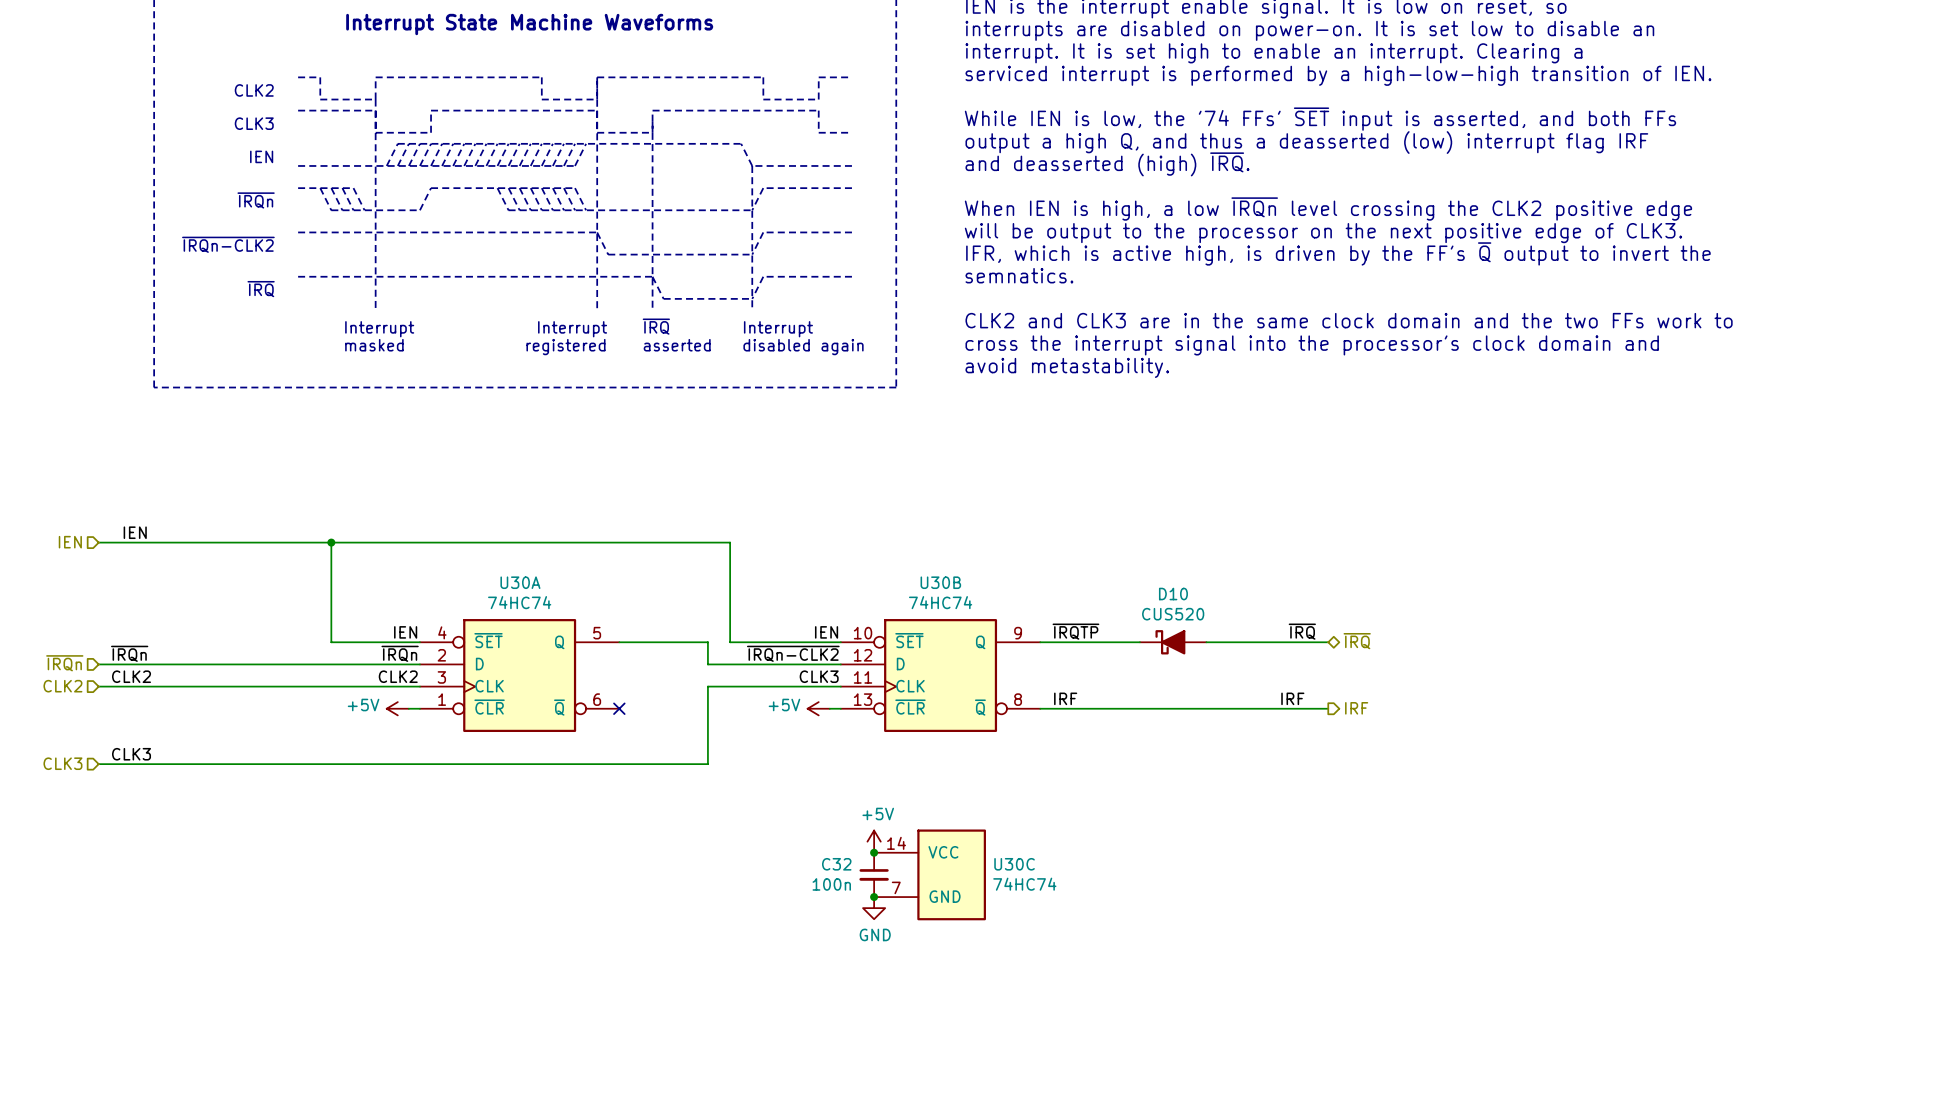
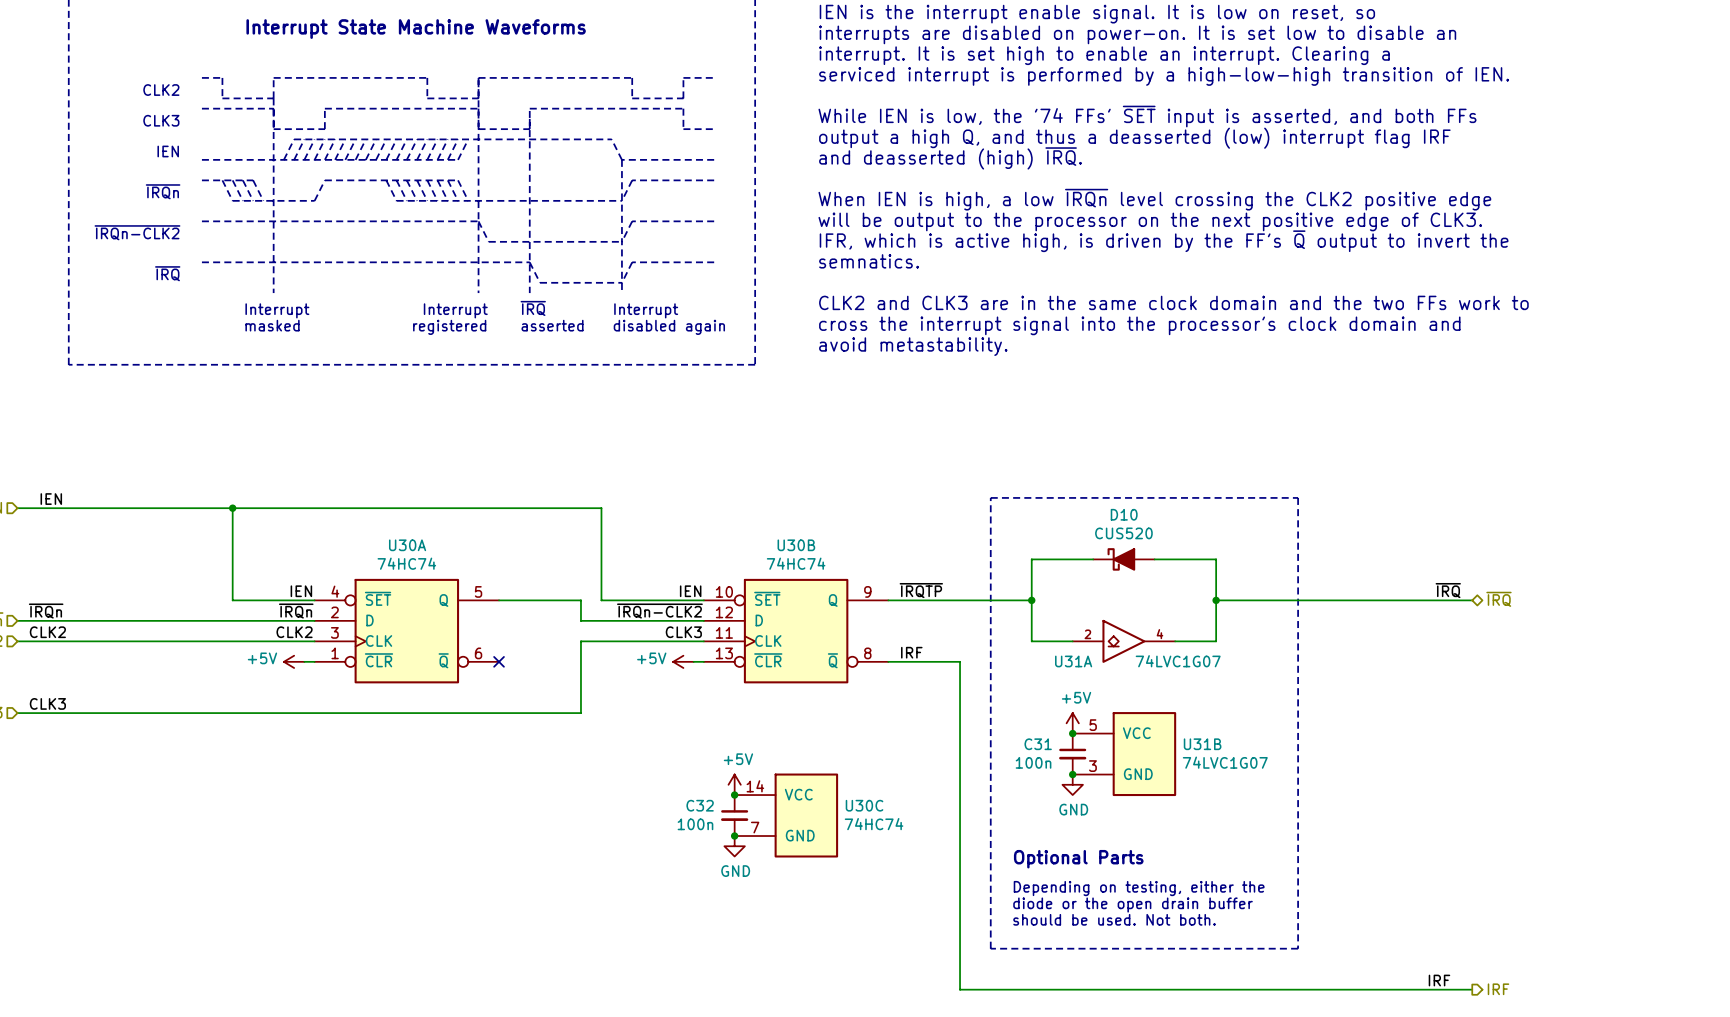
line: none -> (990, 497) (1298, 497) (1298, 948) (990, 948) (990, 497)
wire: none -> (1093, 559) (1031, 559) (1031, 641) (1072, 641)
wire: none -> (1154, 559) (1216, 559) (1216, 641) (1175, 641)
label: ~{IRQ} (1302, 631) -> none
label: none -> ~{IRQ} (1448, 590)
hierarchical label: ~{IRQ} (1357, 641) -> none
hierarchical label: none -> ~{IRQ} (1498, 599)
D10 position: (1173, 642) -> (1123, 559)
junction: none -> (1031, 600)
wire: (1206, 642) (1328, 642) -> none
wire: none -> (1216, 600) (1472, 600)
junction: none -> (1216, 600)
U31A: none -> 74LVC1G07 (1123, 641)
label: IRF (1292, 698) -> none
wire: (1117, 708) (1328, 708) -> (960, 661) (960, 989) (1472, 989)
hierarchical label: IRF (1356, 708) -> none
power symbol: none -> +5V (1072, 723)
junction: none -> (1072, 733)
C31: none -> 100n (1072, 754)
U31B: none -> 74LVC1G07 (1124, 754)
junction: none -> (1072, 774)
power symbol: none -> GND (1072, 784)
text: none -> Optional Parts (1078, 859)
text: none -> Depending on testing, either the (1139, 888)
text: none -> diode or the open drain buffer (1133, 905)
text: none -> should be used. Not both. (1114, 919)
label: none -> IRF (1439, 980)
hierarchical label: none -> IRF (1498, 989)

